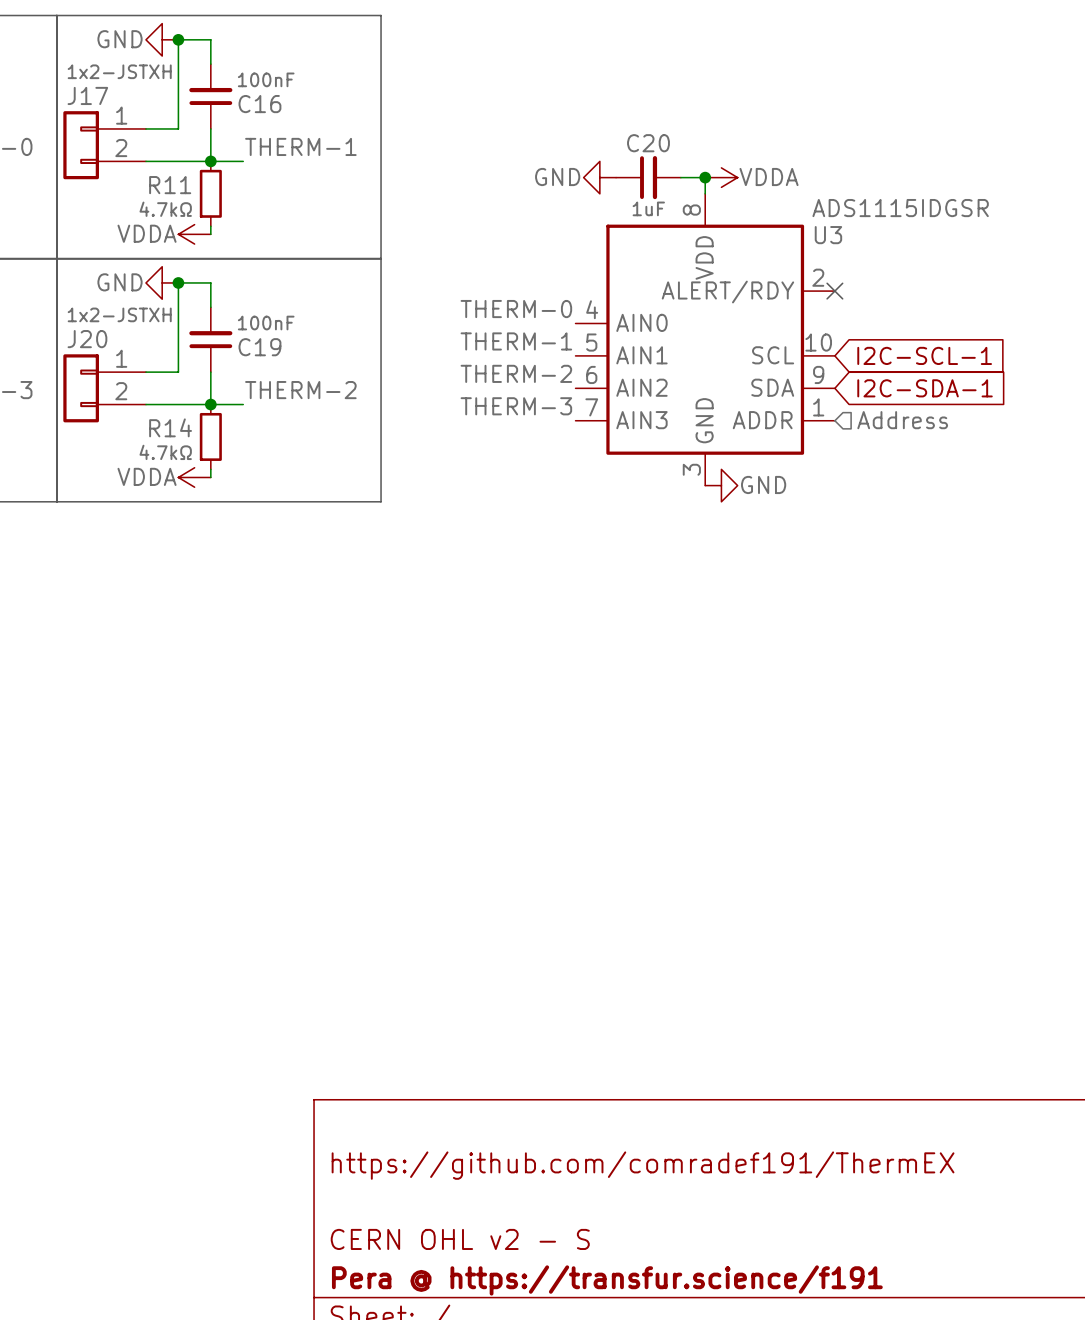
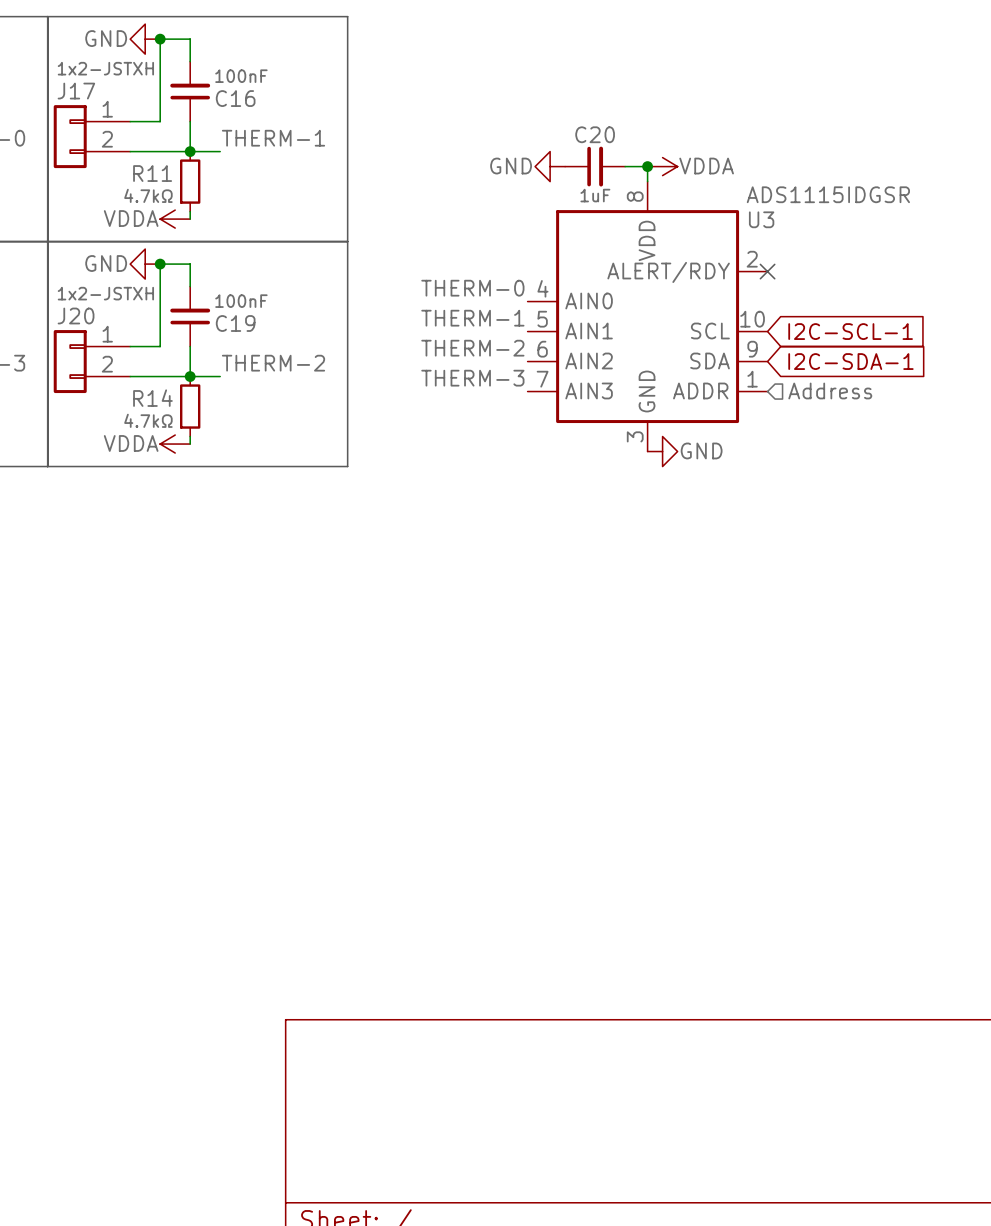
title block: https://github.com/comradef191/ThermEX (643, 1165) -> none
title block: CERN OHL v2 - S (460, 1239) -> none
title block: Pera @ https://transfur.science/f191 (607, 1280) -> none

